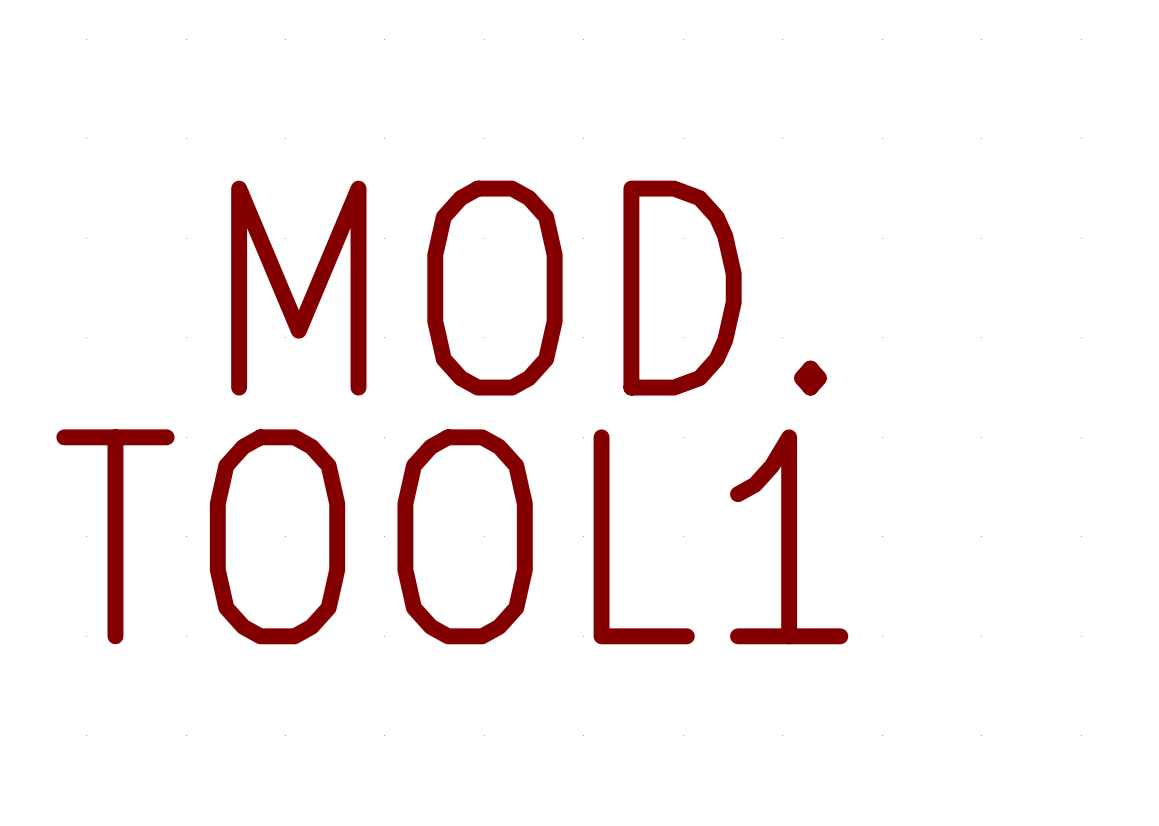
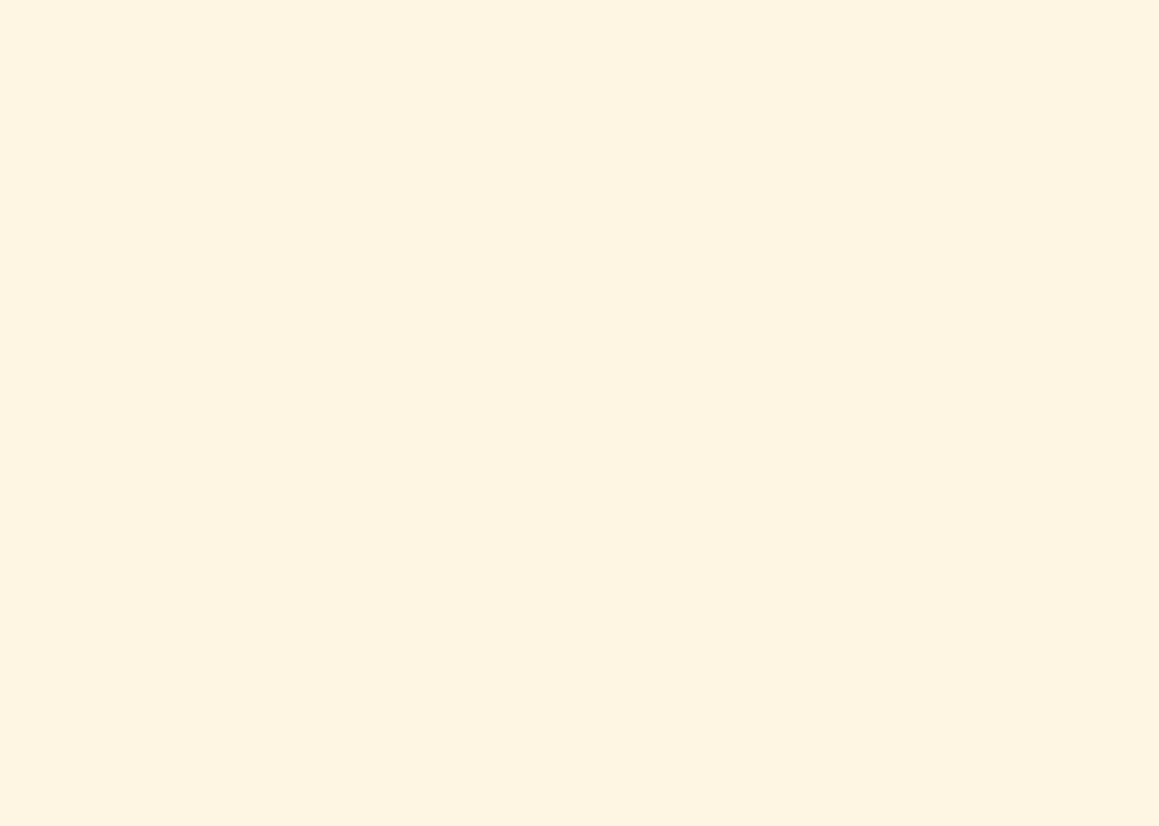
text: MOD. (529, 288) -> none
text: TOOL1 (452, 536) -> none

